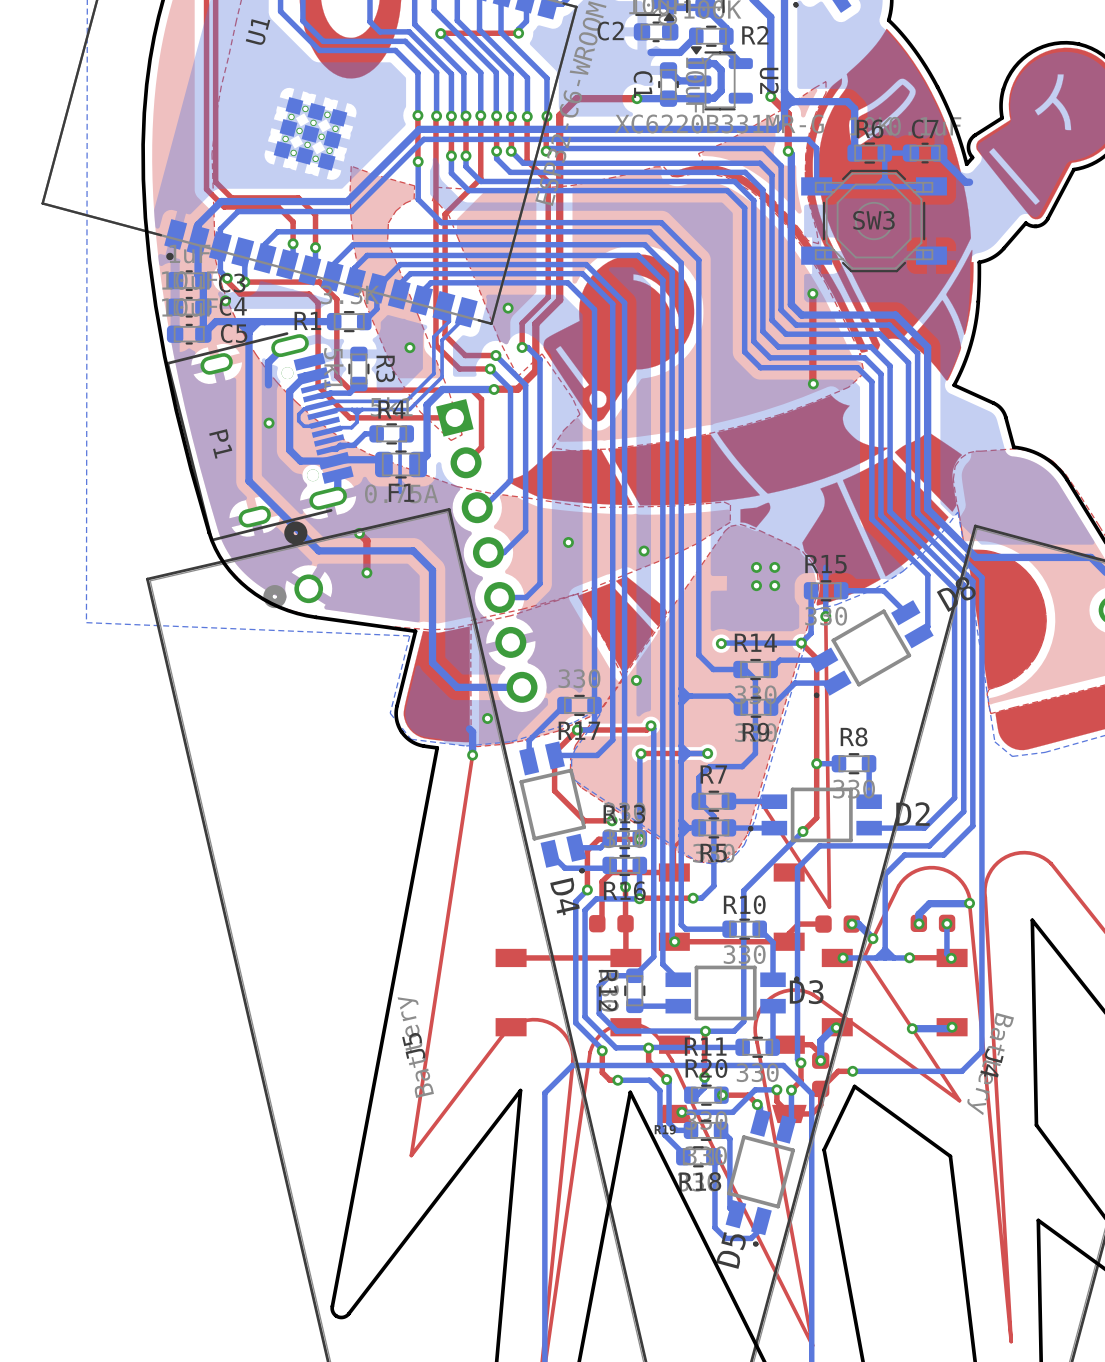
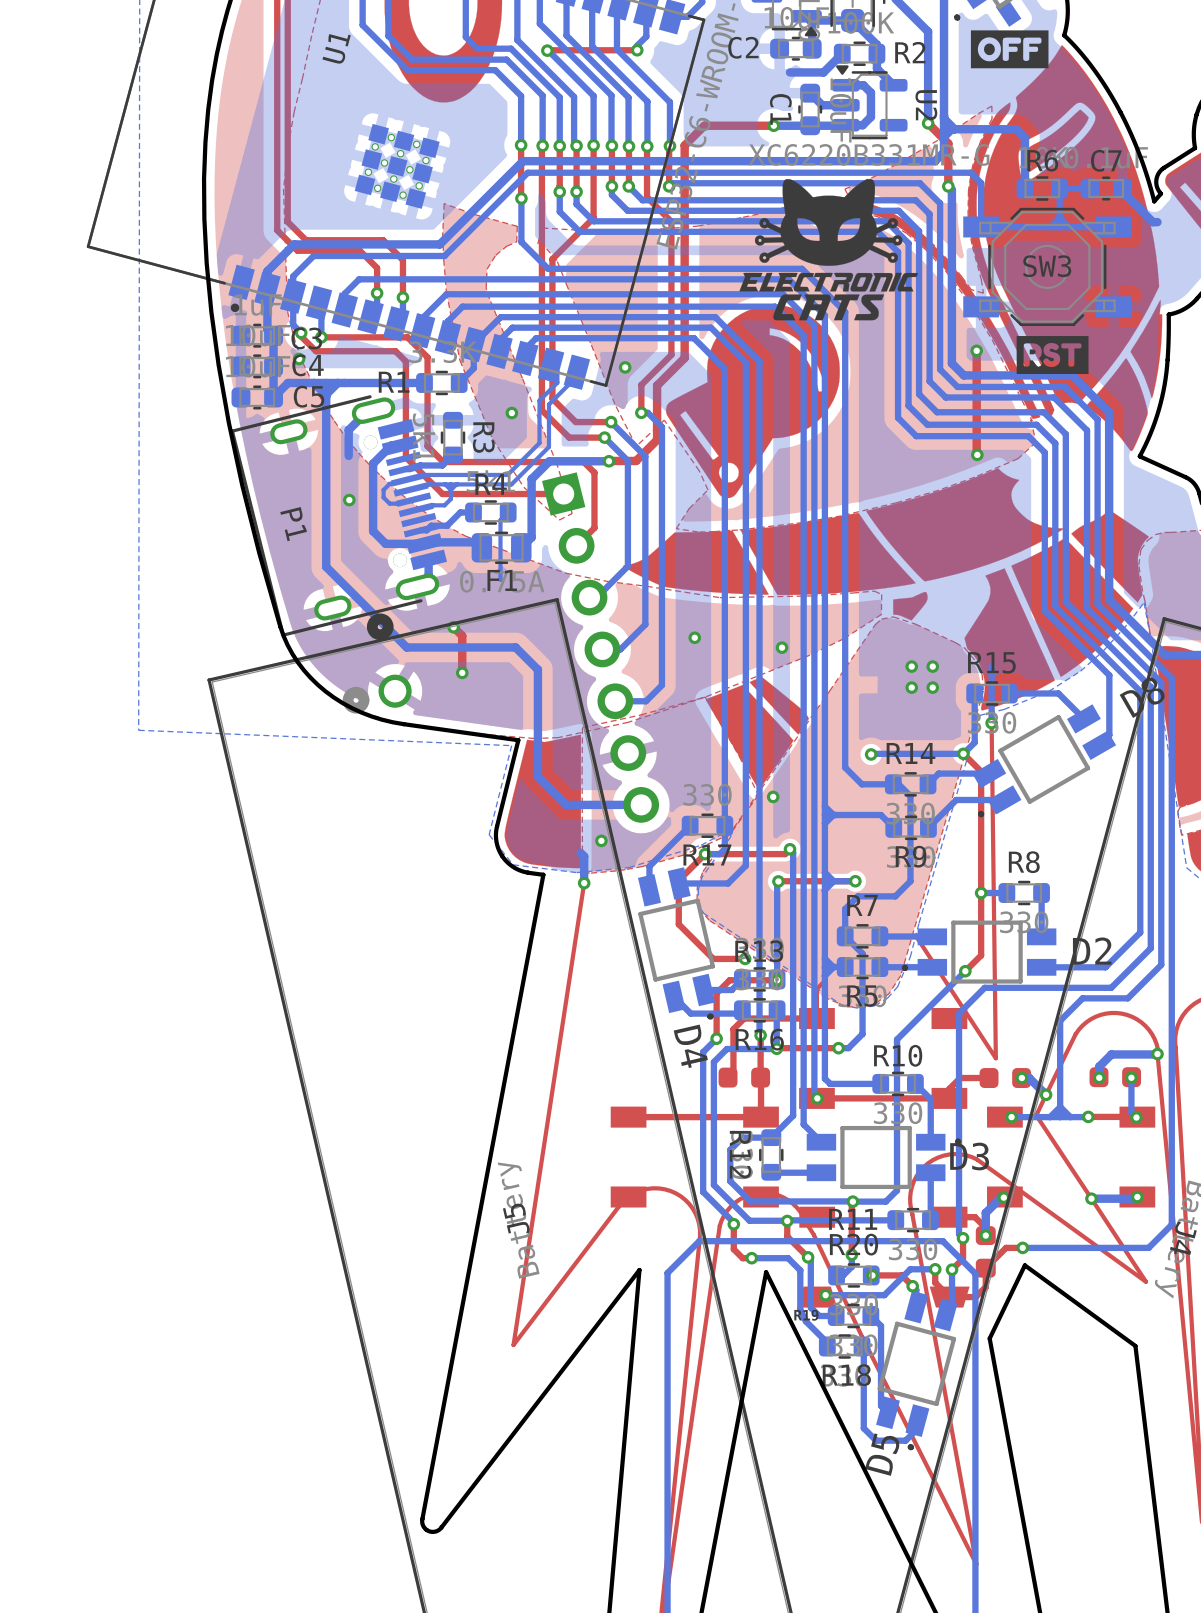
drawing: none -> [970, 30, 1049, 69]
drawing: none -> [739, 179, 918, 321]
drawing: none -> [1016, 336, 1089, 374]

